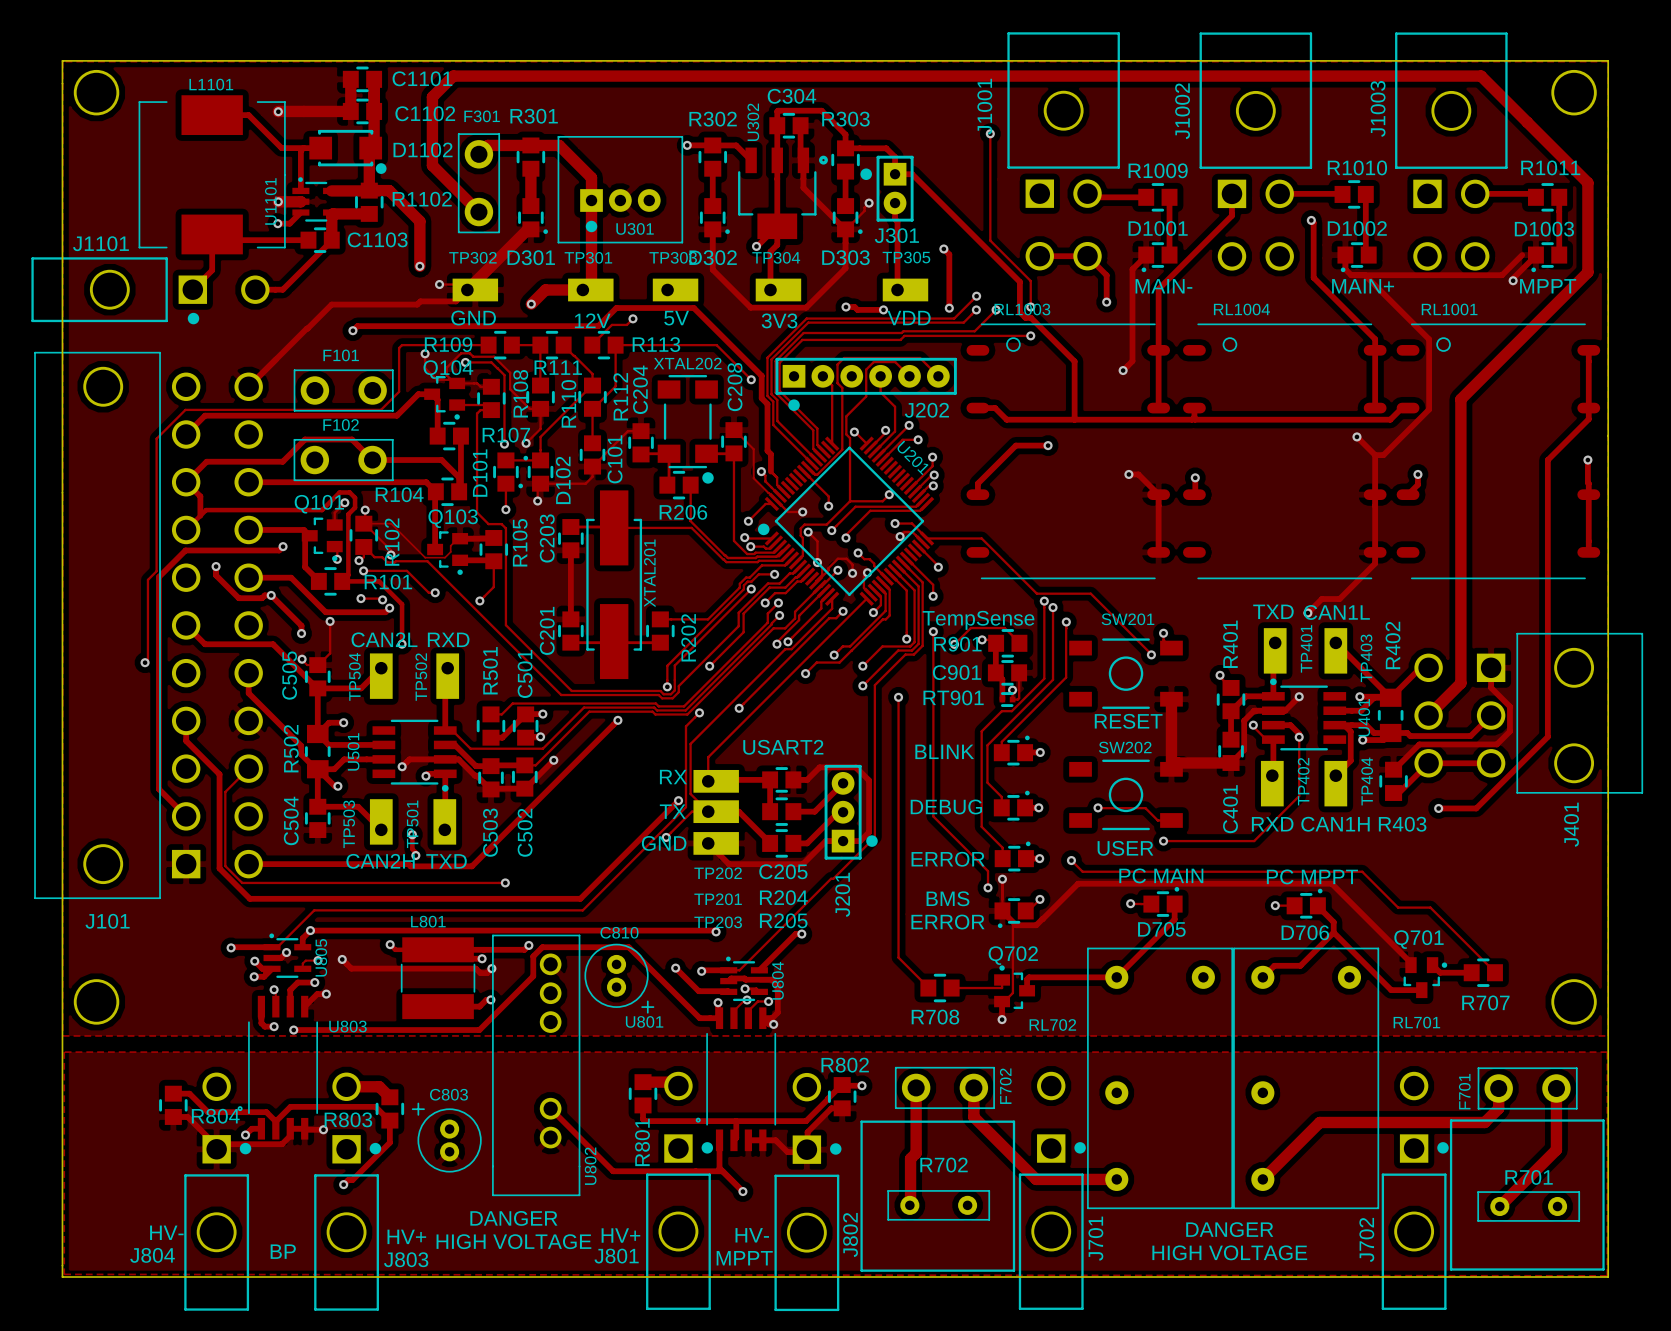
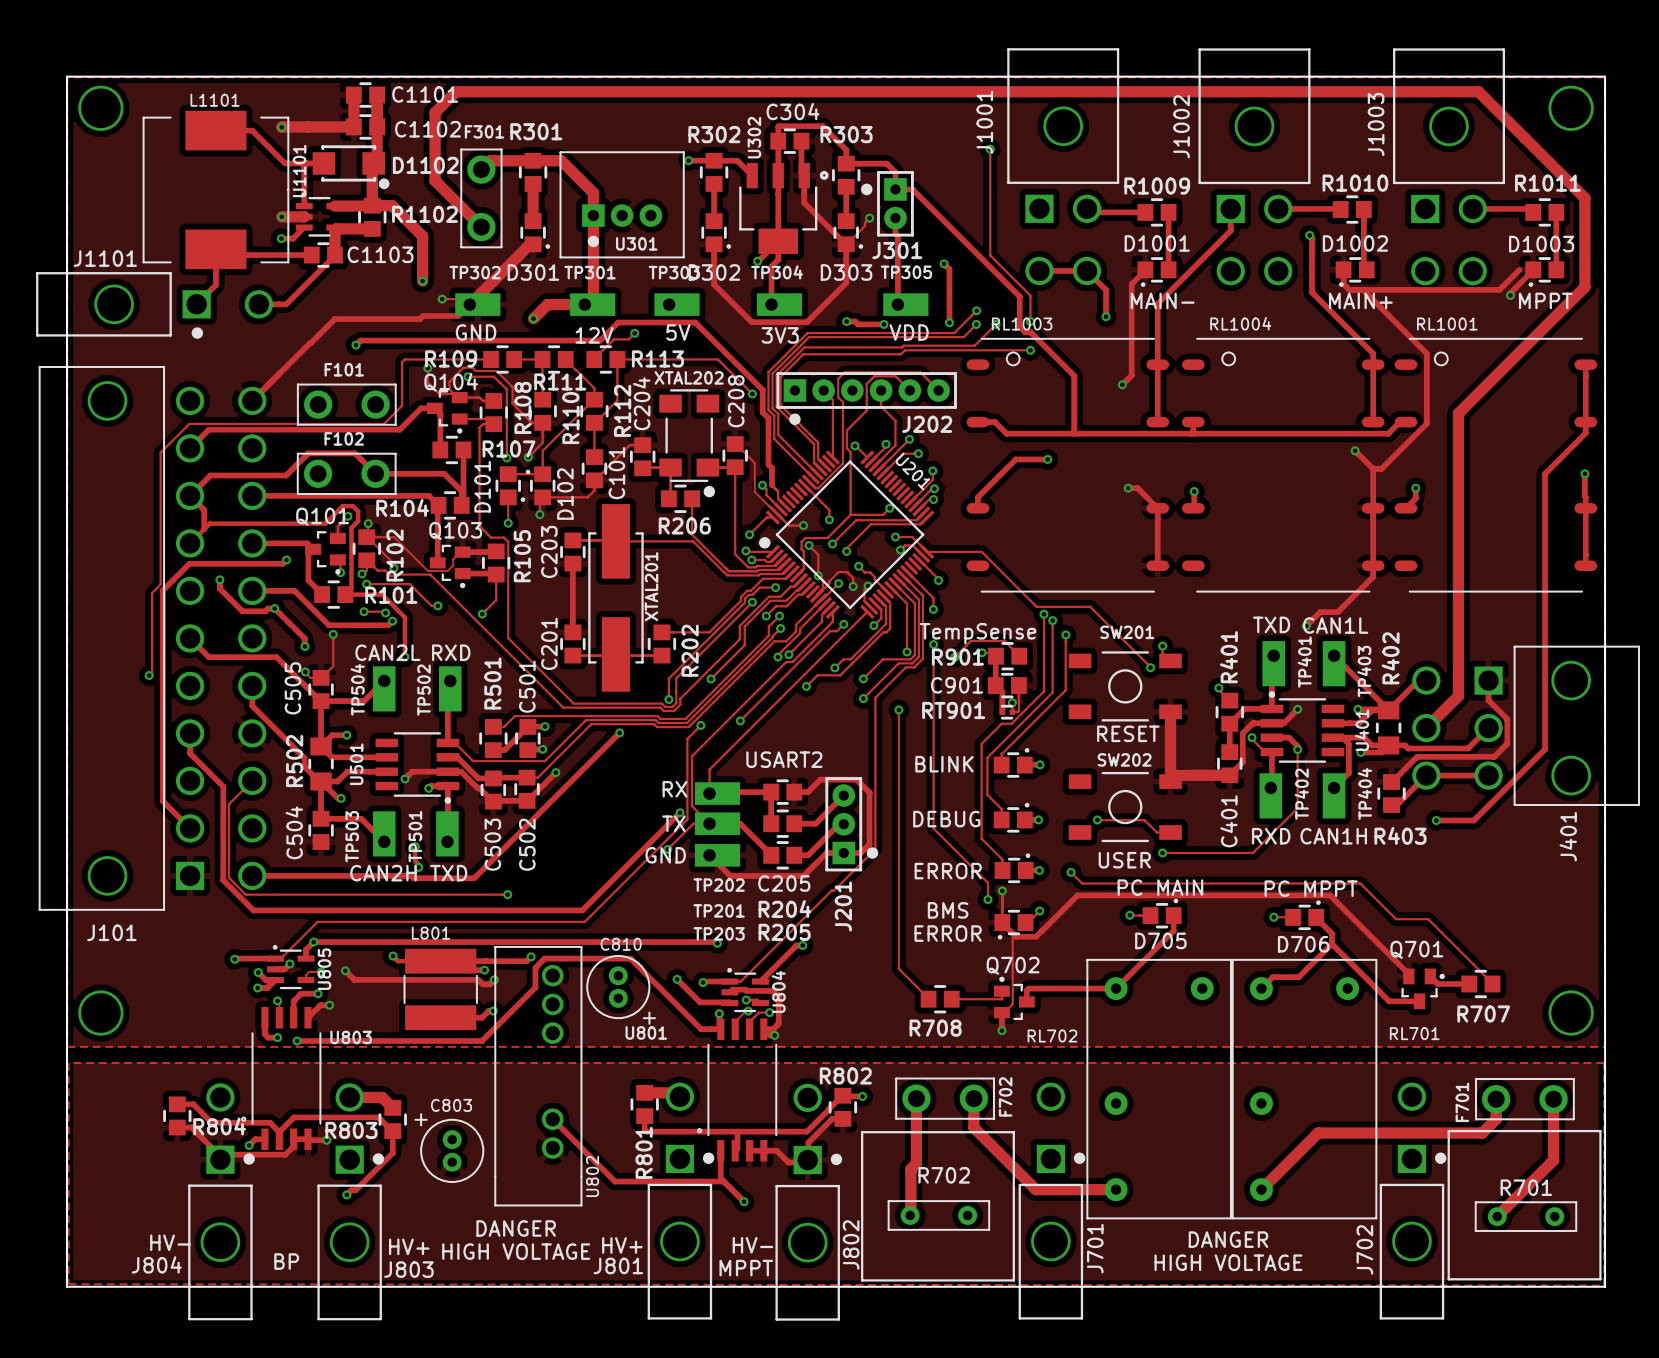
U1101 name position: U1101 (270, 201) -> U1101 (299, 171)

